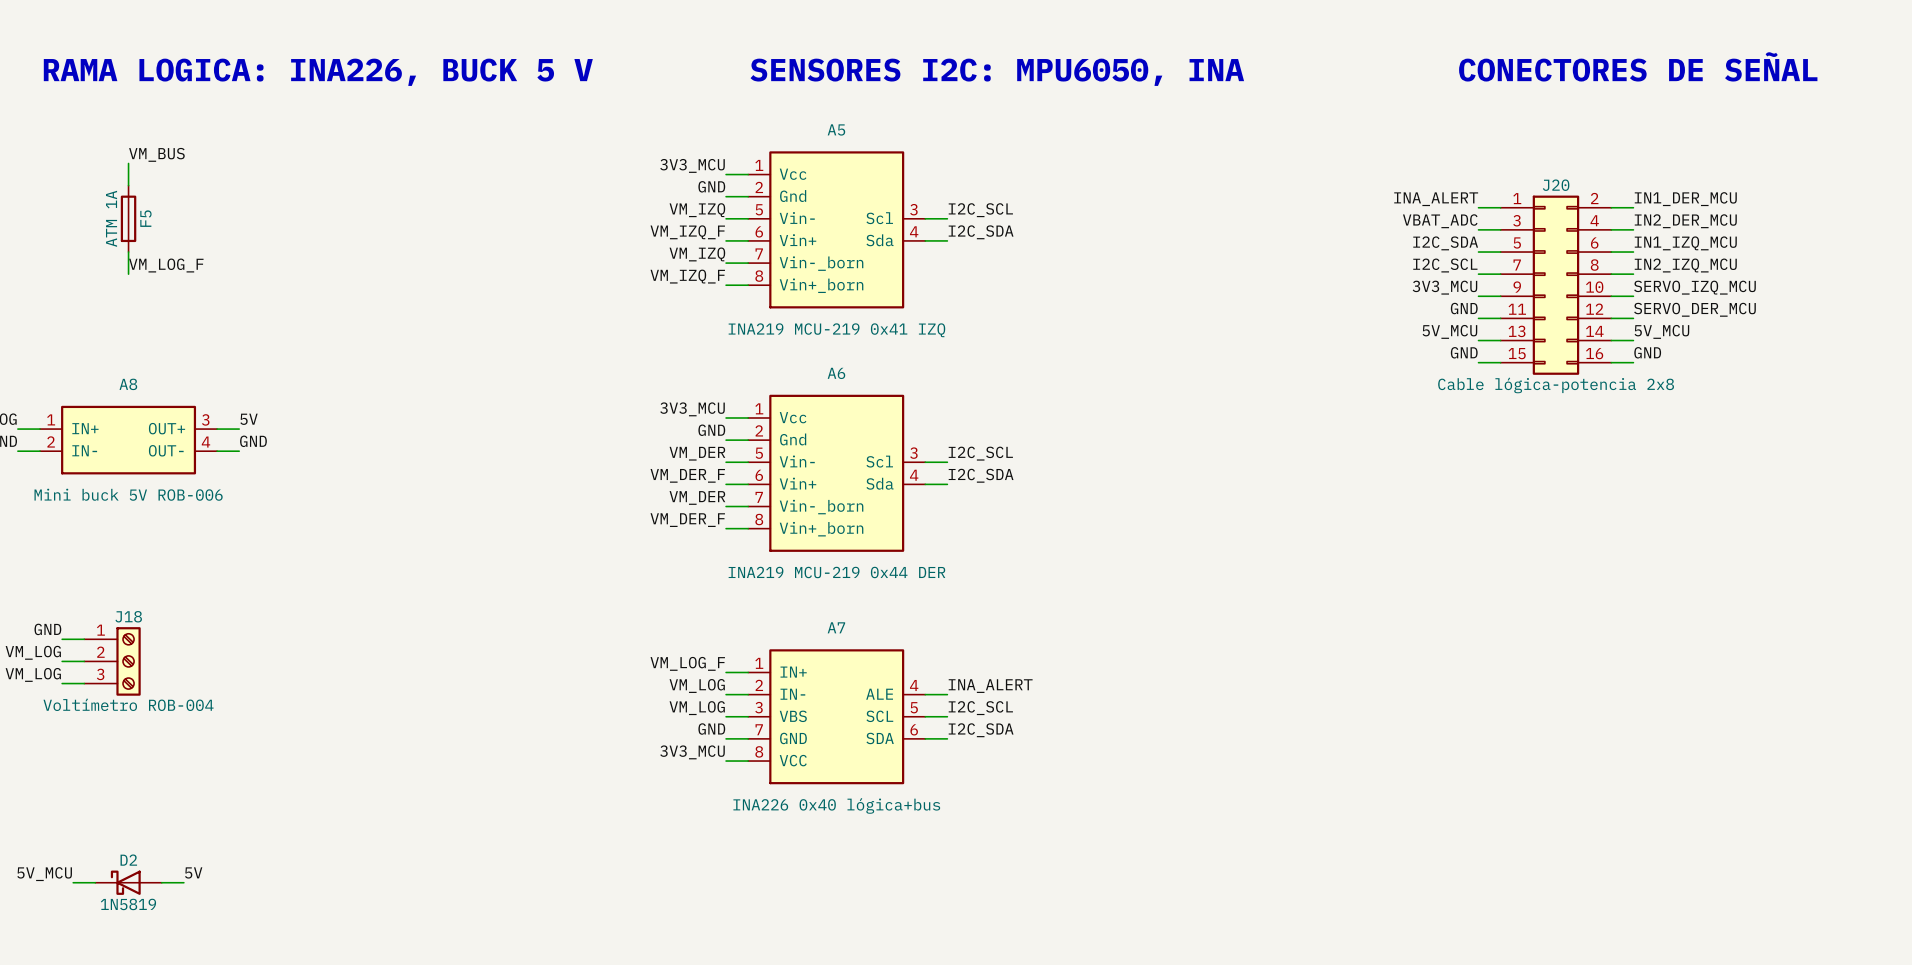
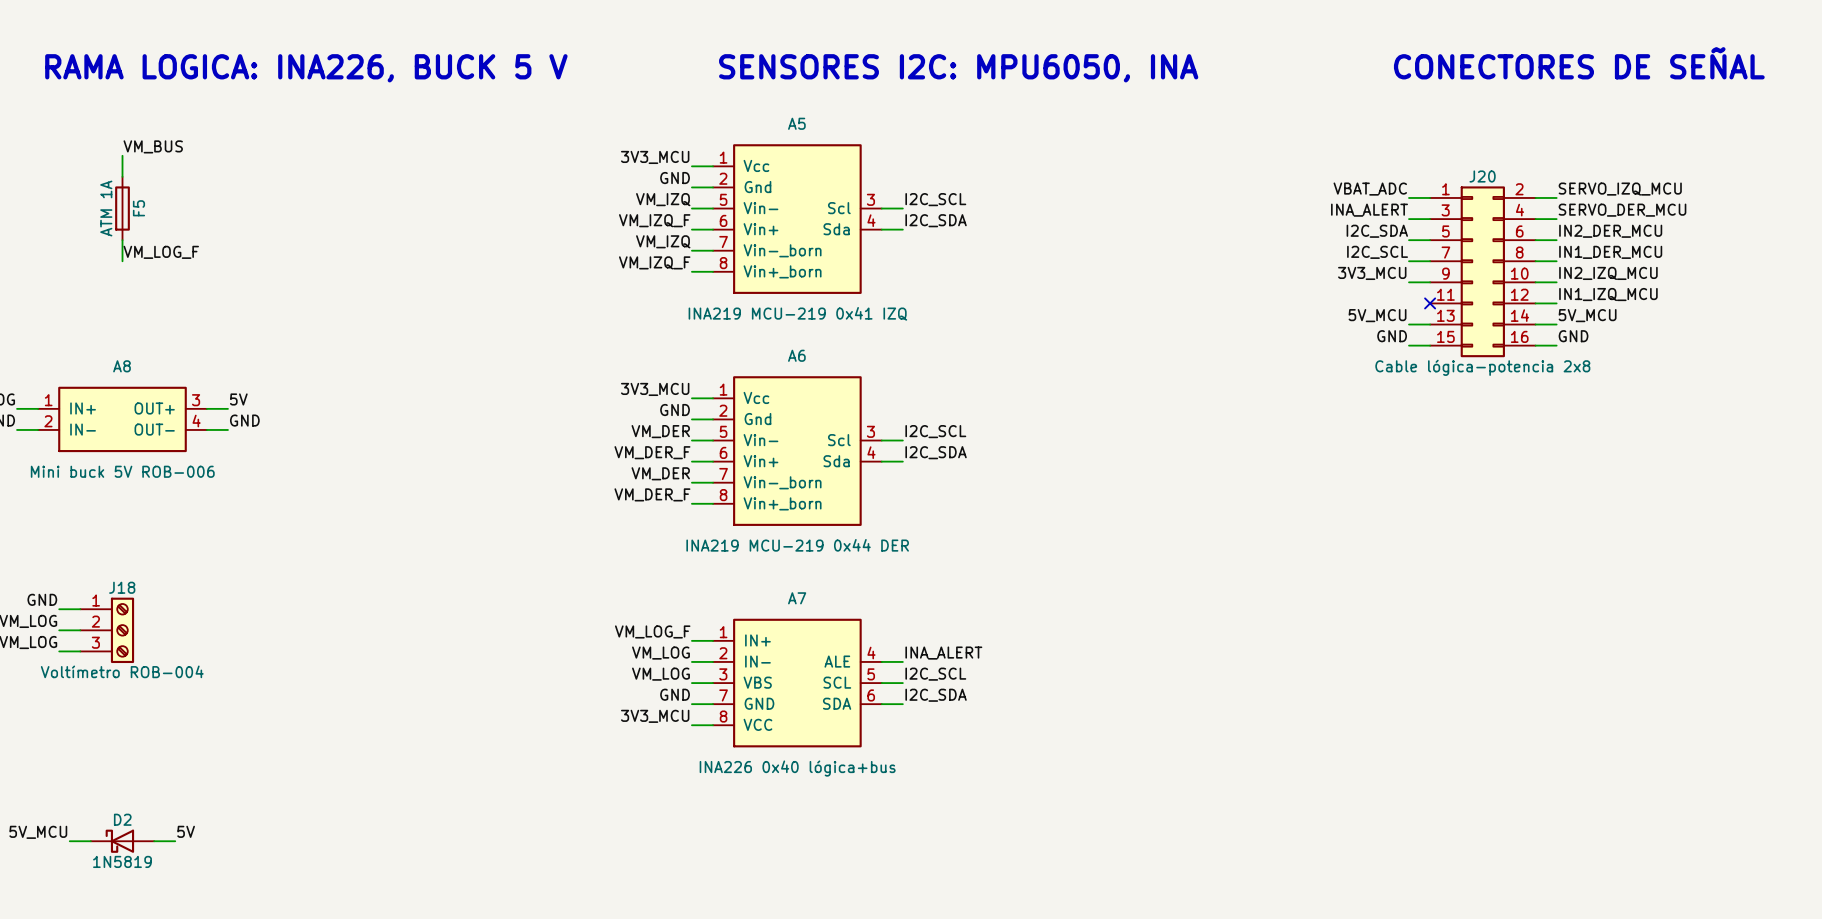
label: INA_ALERT (1436, 199) -> VBAT_ADC (1370, 189)
label: IN1_DER_MCU (1685, 199) -> SERVO_IZQ_MCU (1620, 189)
label: VBAT_ADC (1440, 221) -> INA_ALERT (1369, 210)
label: IN2_DER_MCU (1685, 221) -> SERVO_DER_MCU (1622, 210)
label: IN1_IZQ_MCU (1685, 243) -> IN2_DER_MCU (1610, 231)
label: IN2_IZQ_MCU (1685, 265) -> IN1_DER_MCU (1610, 252)
label: SERVO_IZQ_MCU (1694, 287) -> IN2_IZQ_MCU (1608, 273)
label: GND (1464, 308) -> none
label: SERVO_DER_MCU (1694, 309) -> IN1_IZQ_MCU (1608, 294)
wire: (1478, 318) (1500, 318) -> none
no-connect mark: none -> (1430, 303)

